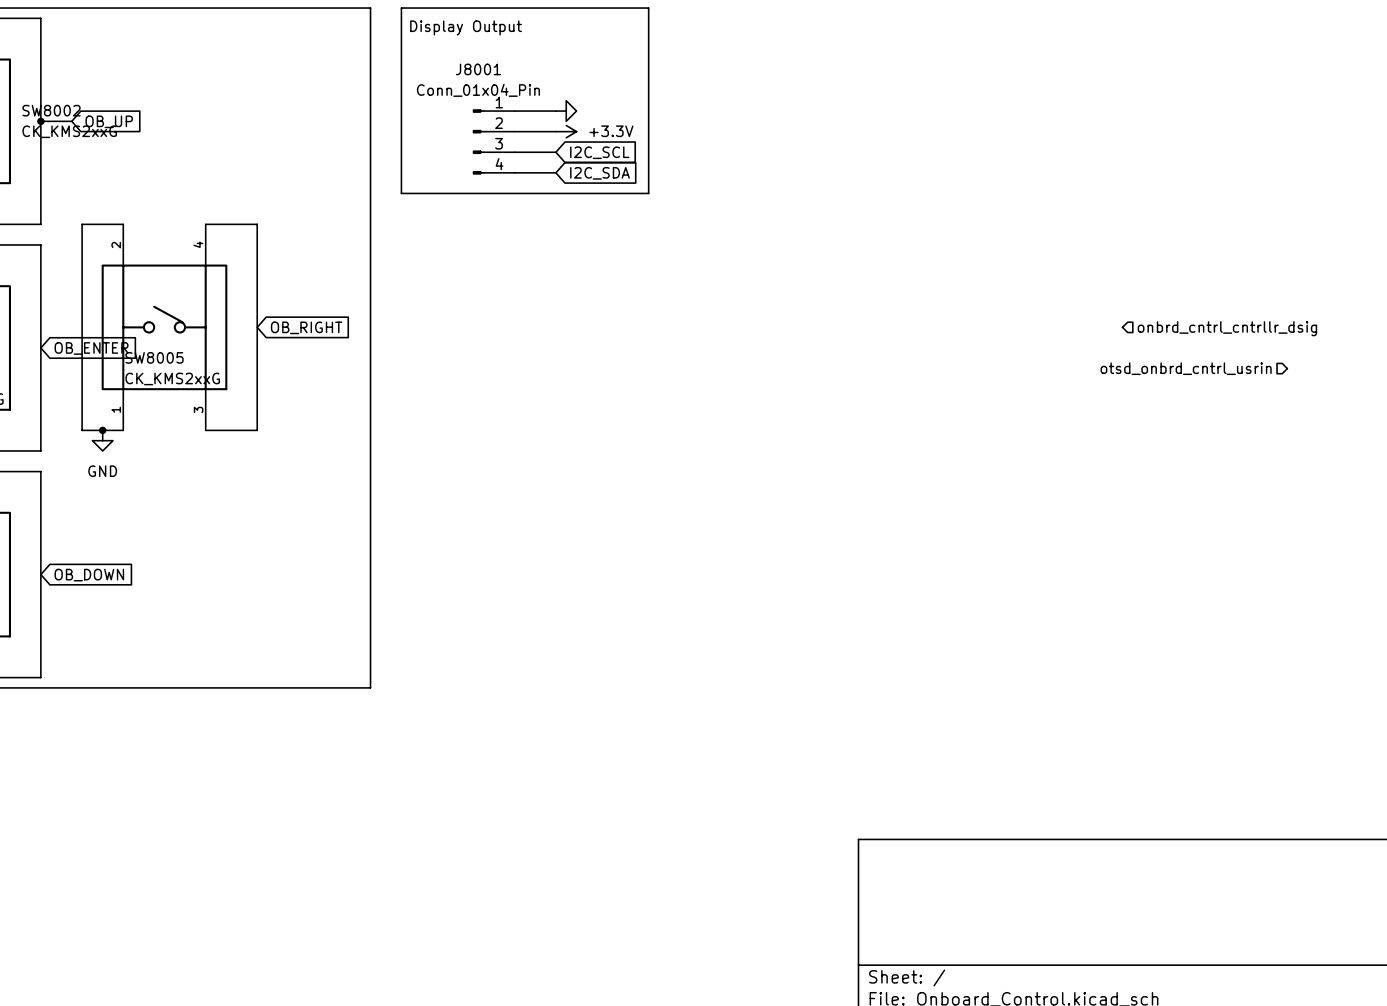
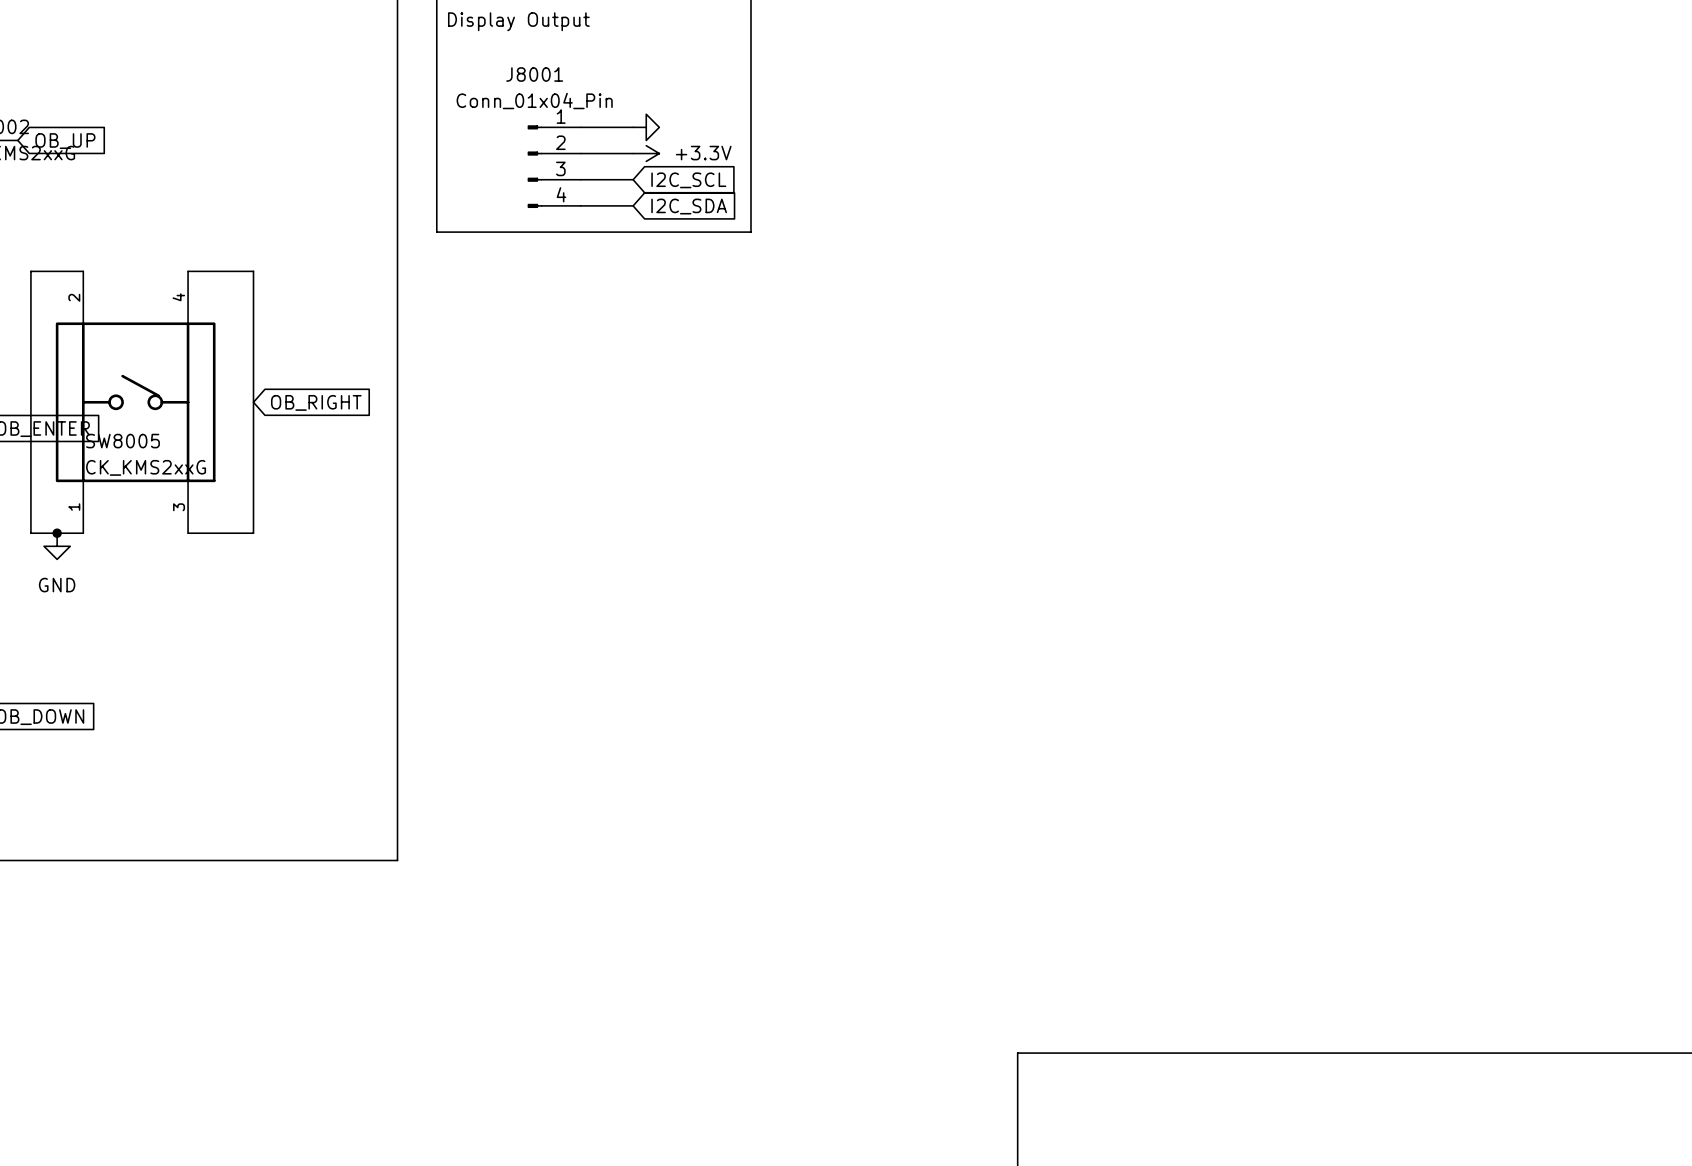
hierarchical label: onbrd_cntrl_cntrllr_dsig (1227, 328) -> none
hierarchical label: otsd_onbrd_cntrl_usrin (1186, 368) -> none

